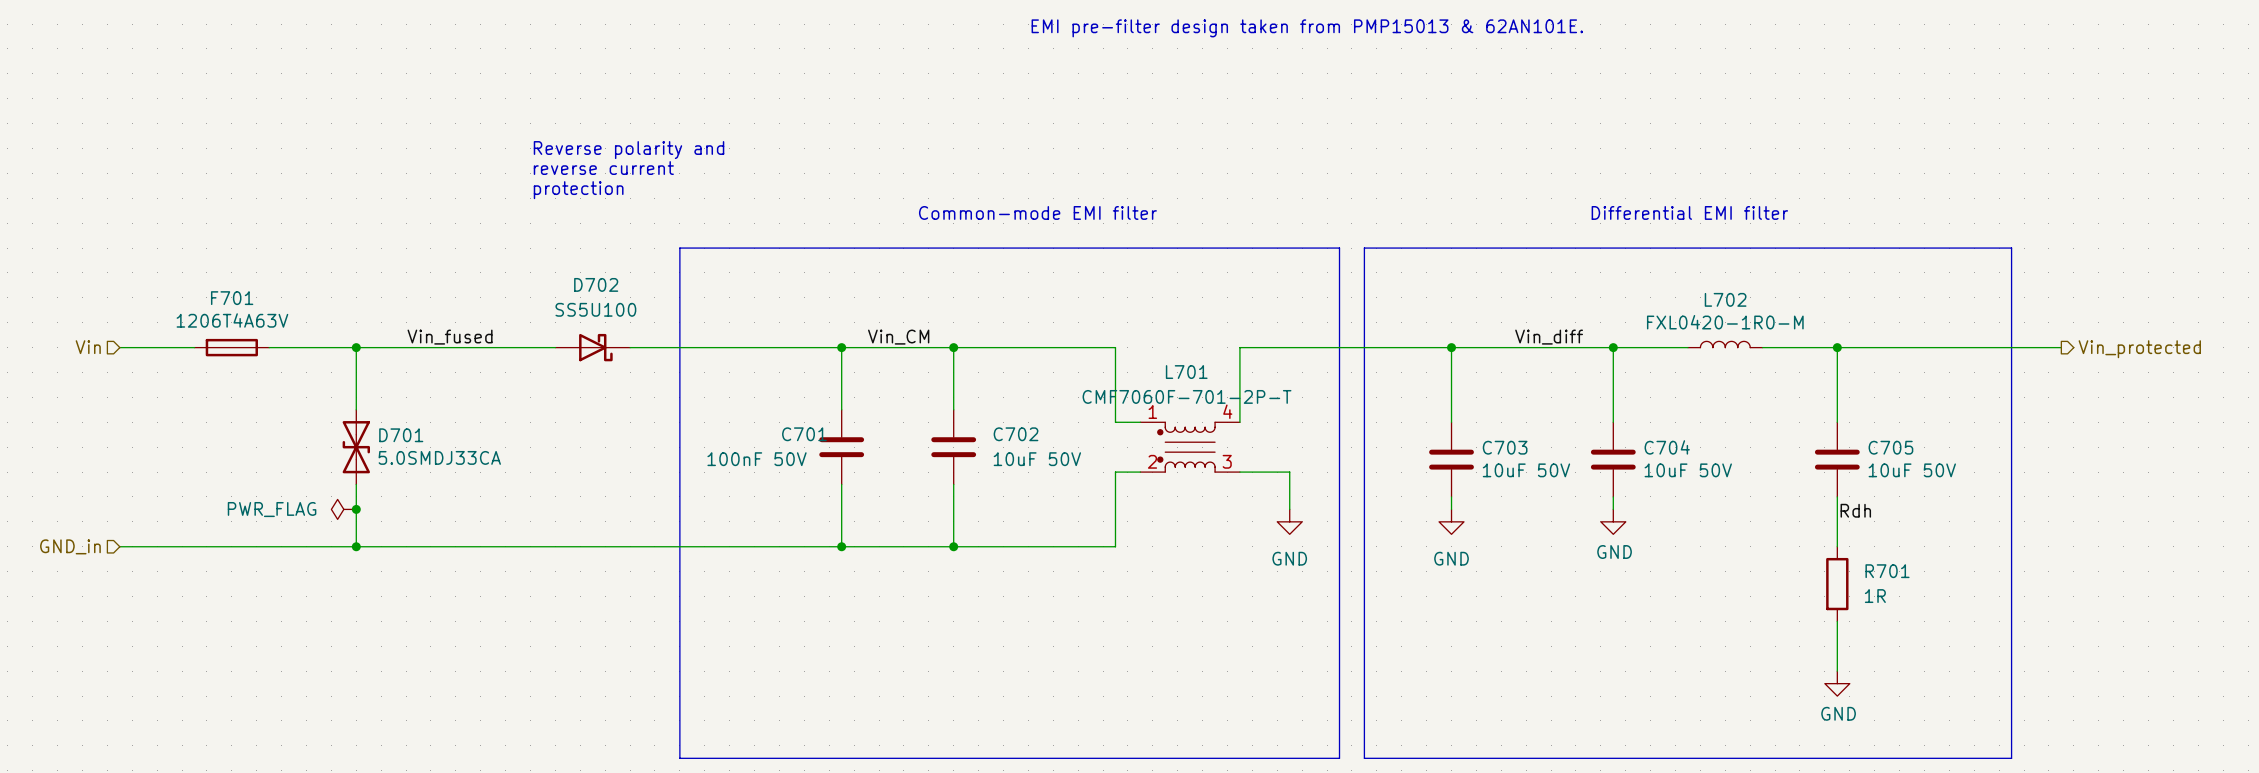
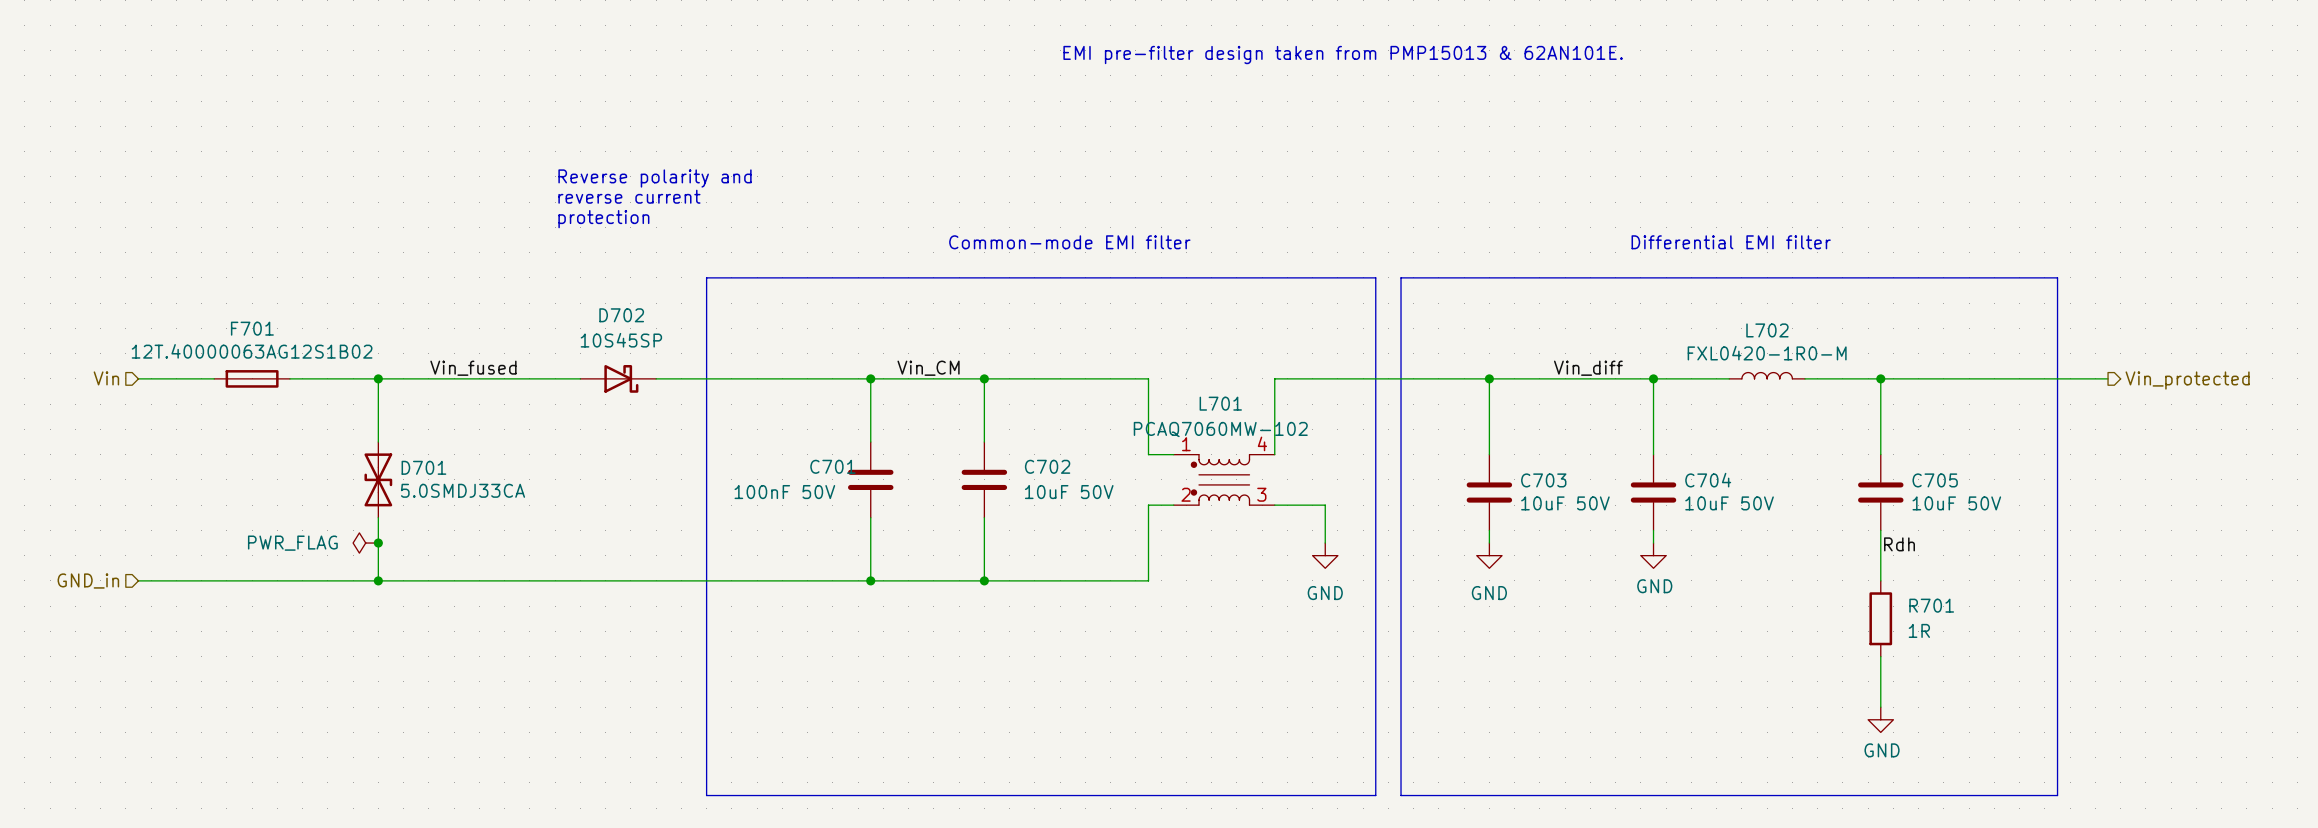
D702 value: SS5U100 (595, 309) -> 10S45SP (621, 340)
F701 value: 1206T4A63V (232, 320) -> 12T.40000063AG12S1B02 (252, 351)
L701 value: CMF7060F-701-2P-T (1187, 396) -> PCAQ7060MW-102 (1220, 429)

